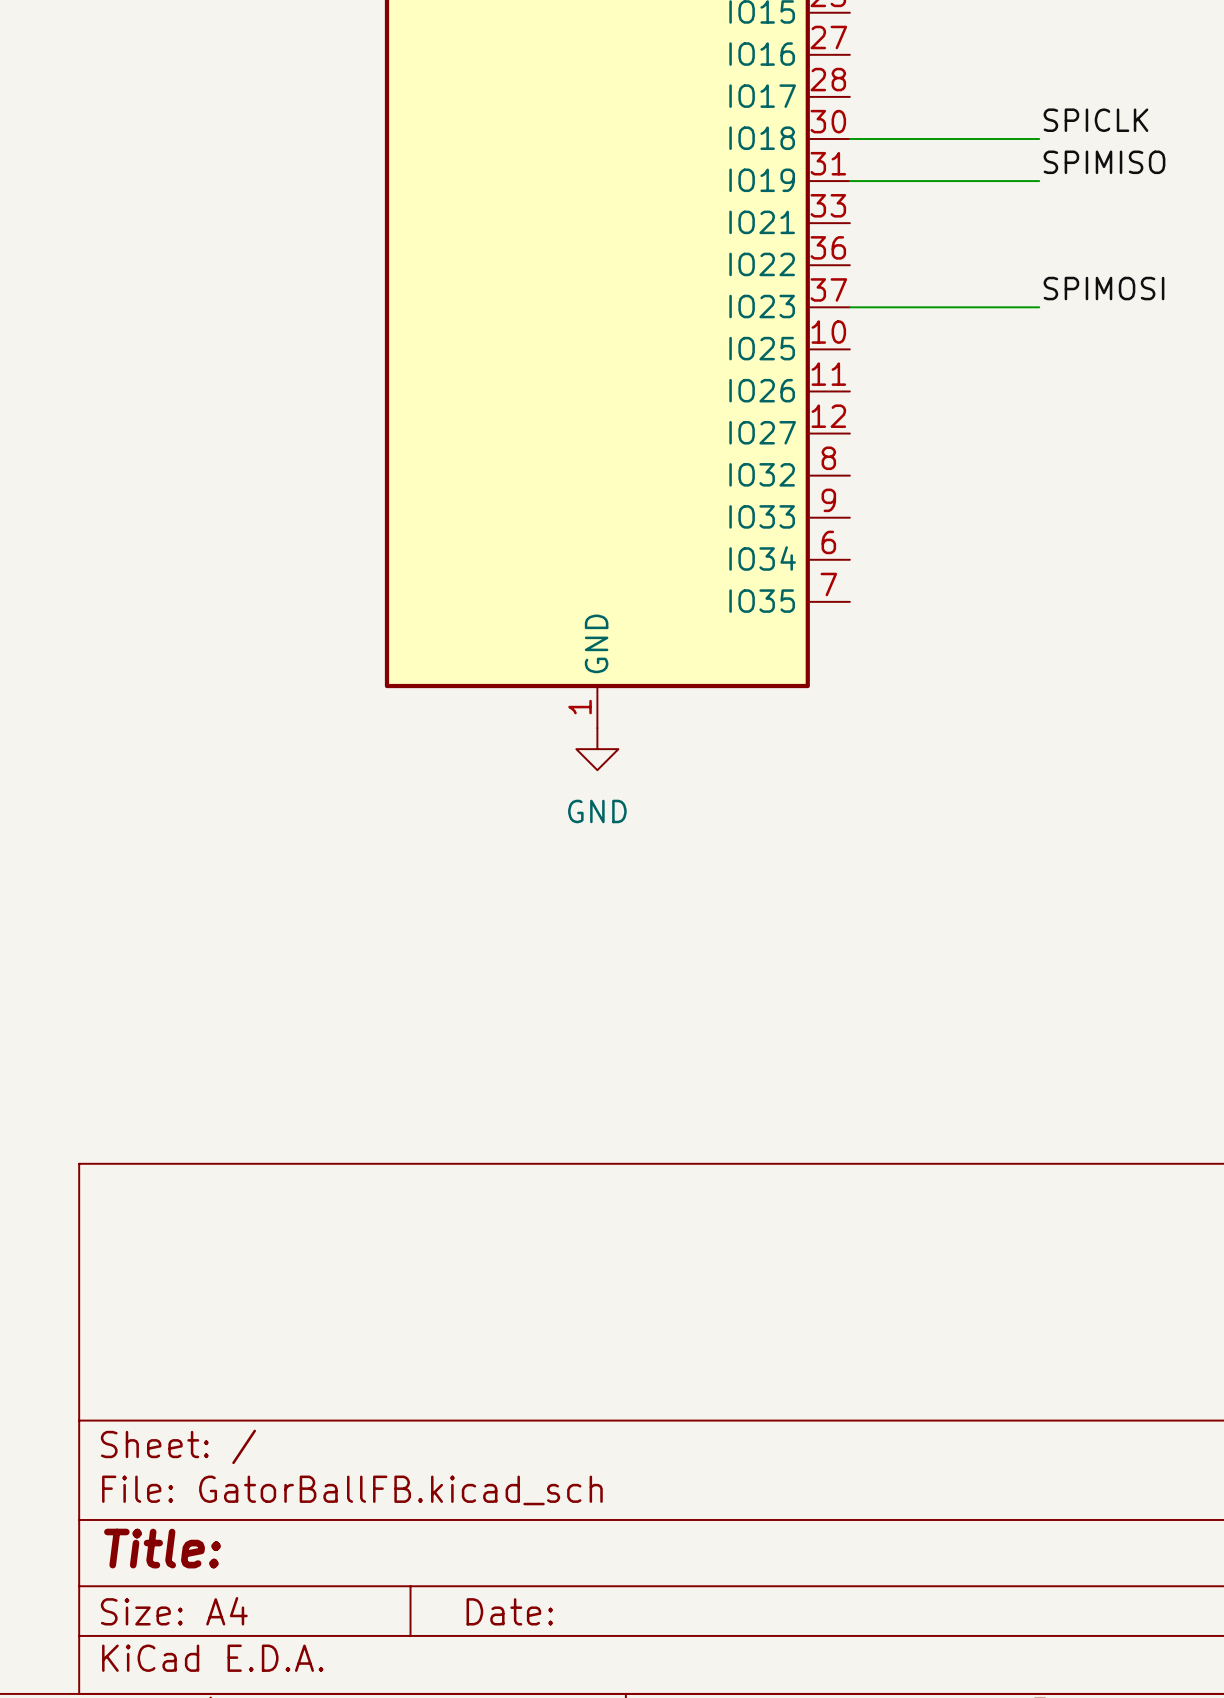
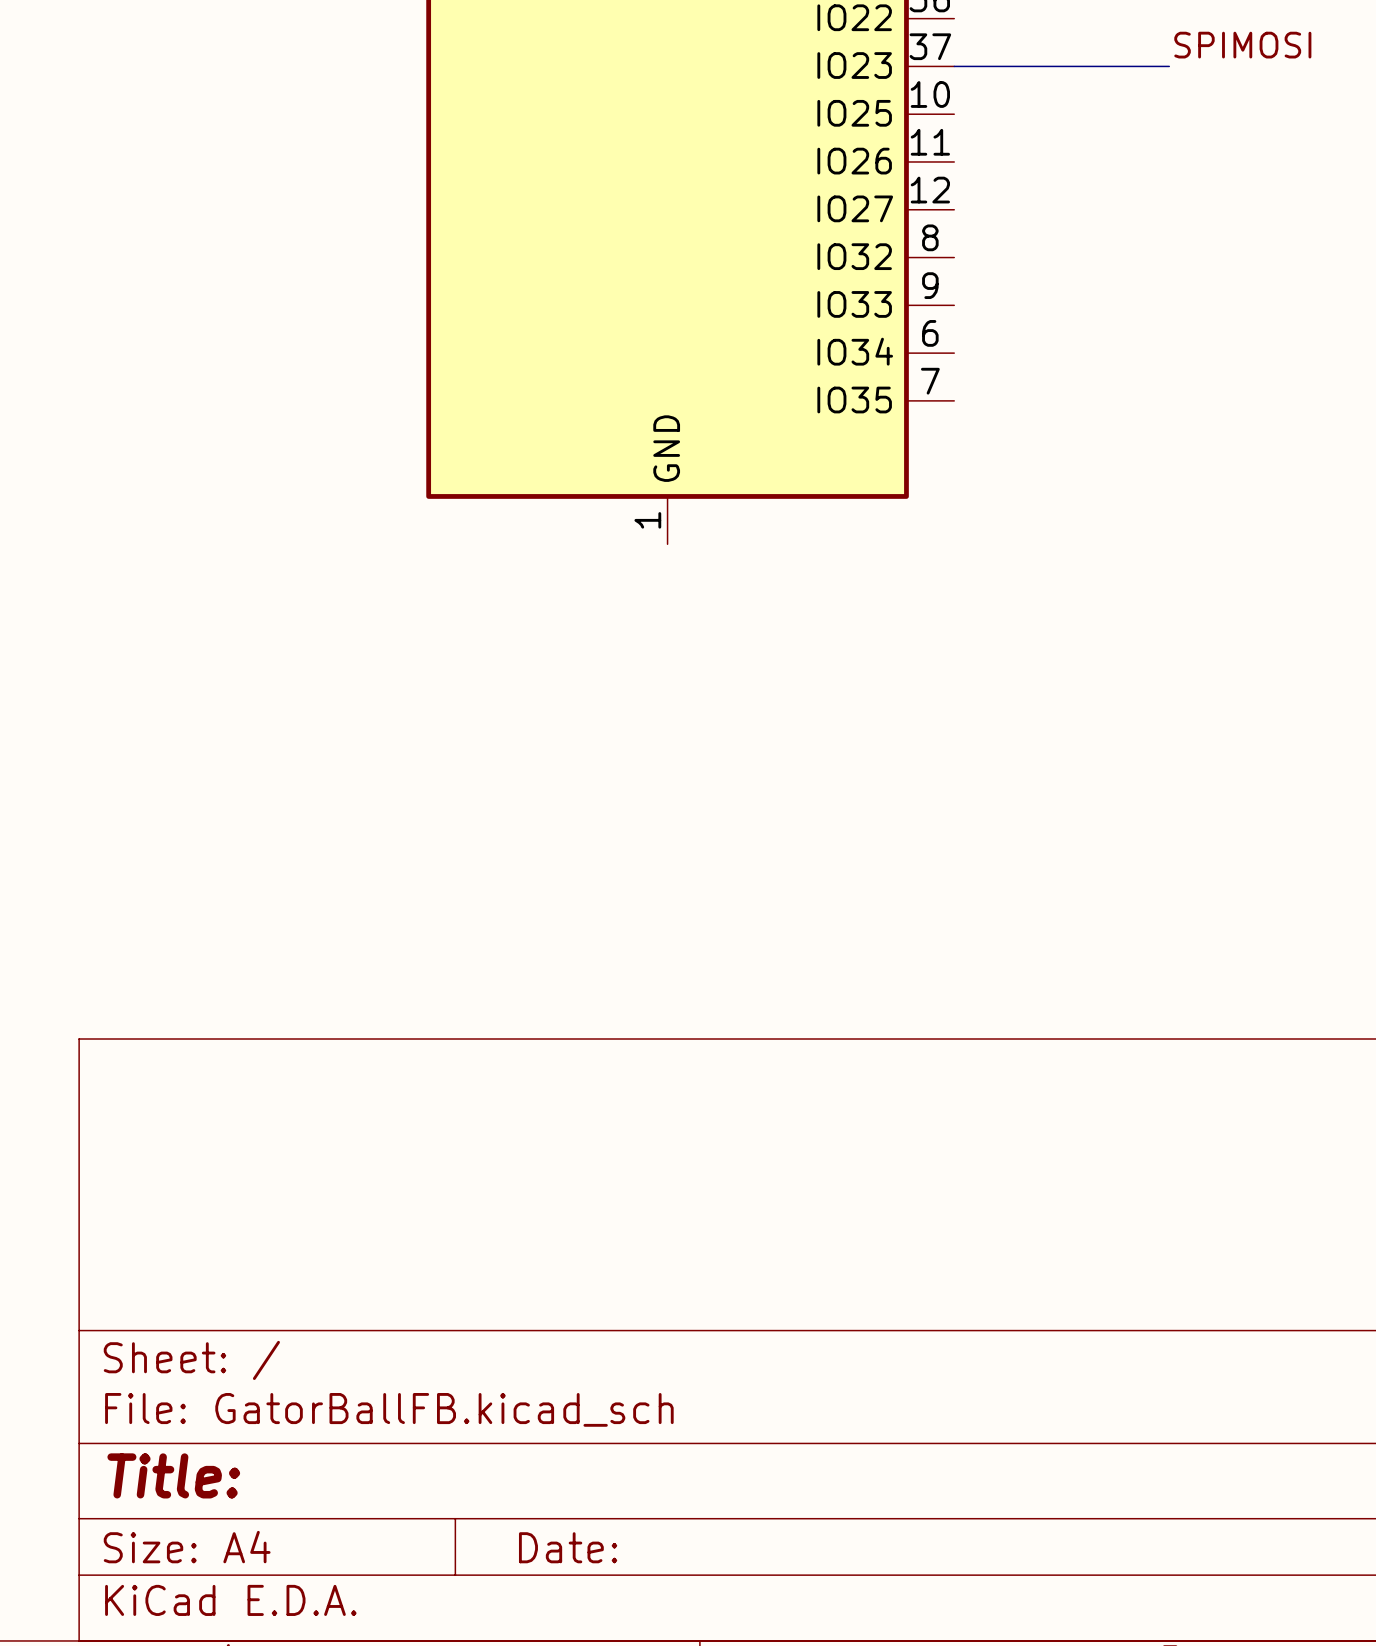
power symbol: GND (597, 749) -> none

